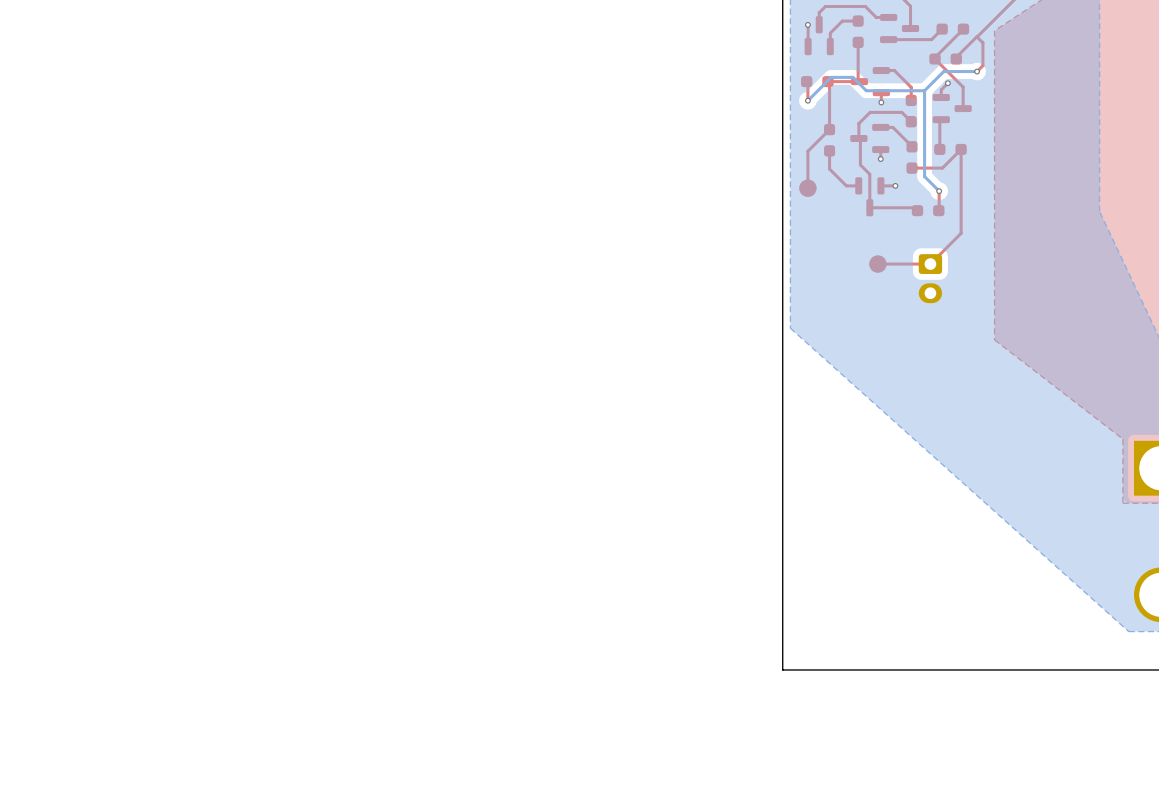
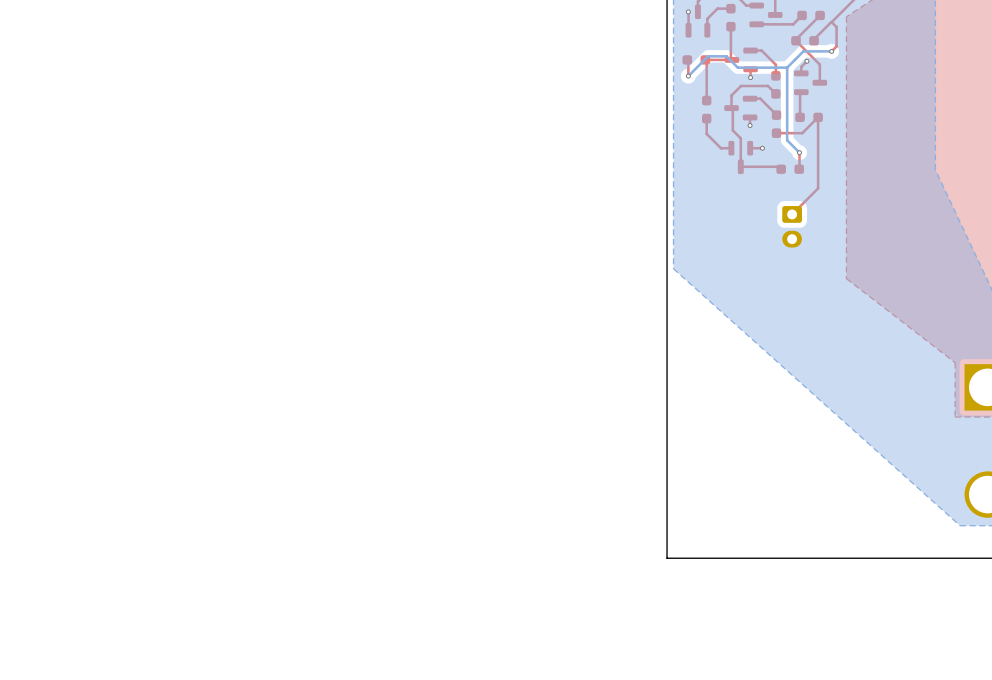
top track: (829, 129) (807, 151) (807, 188) -> none
part: (807, 188) -> none
part: (877, 264) -> none
top track: (930, 264) (877, 264) -> none

